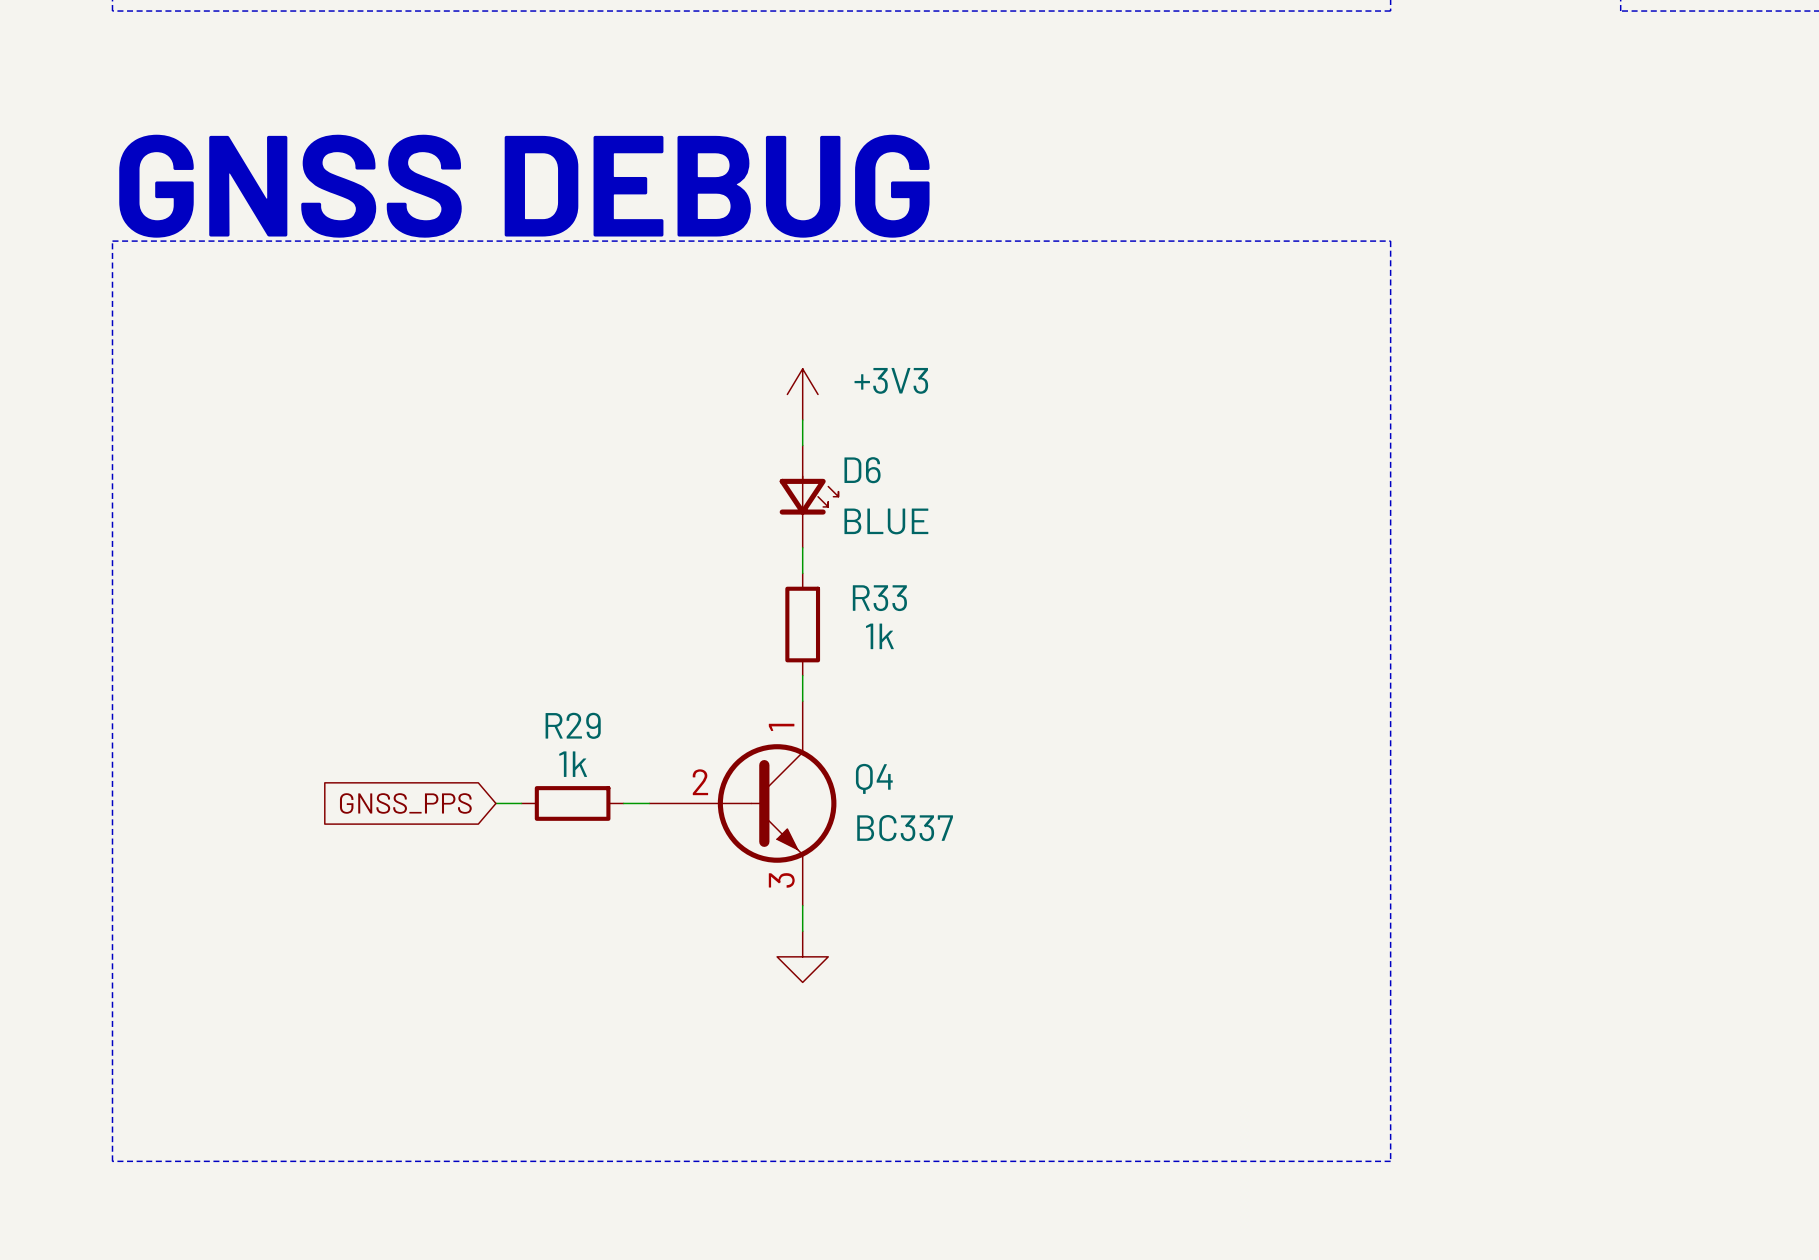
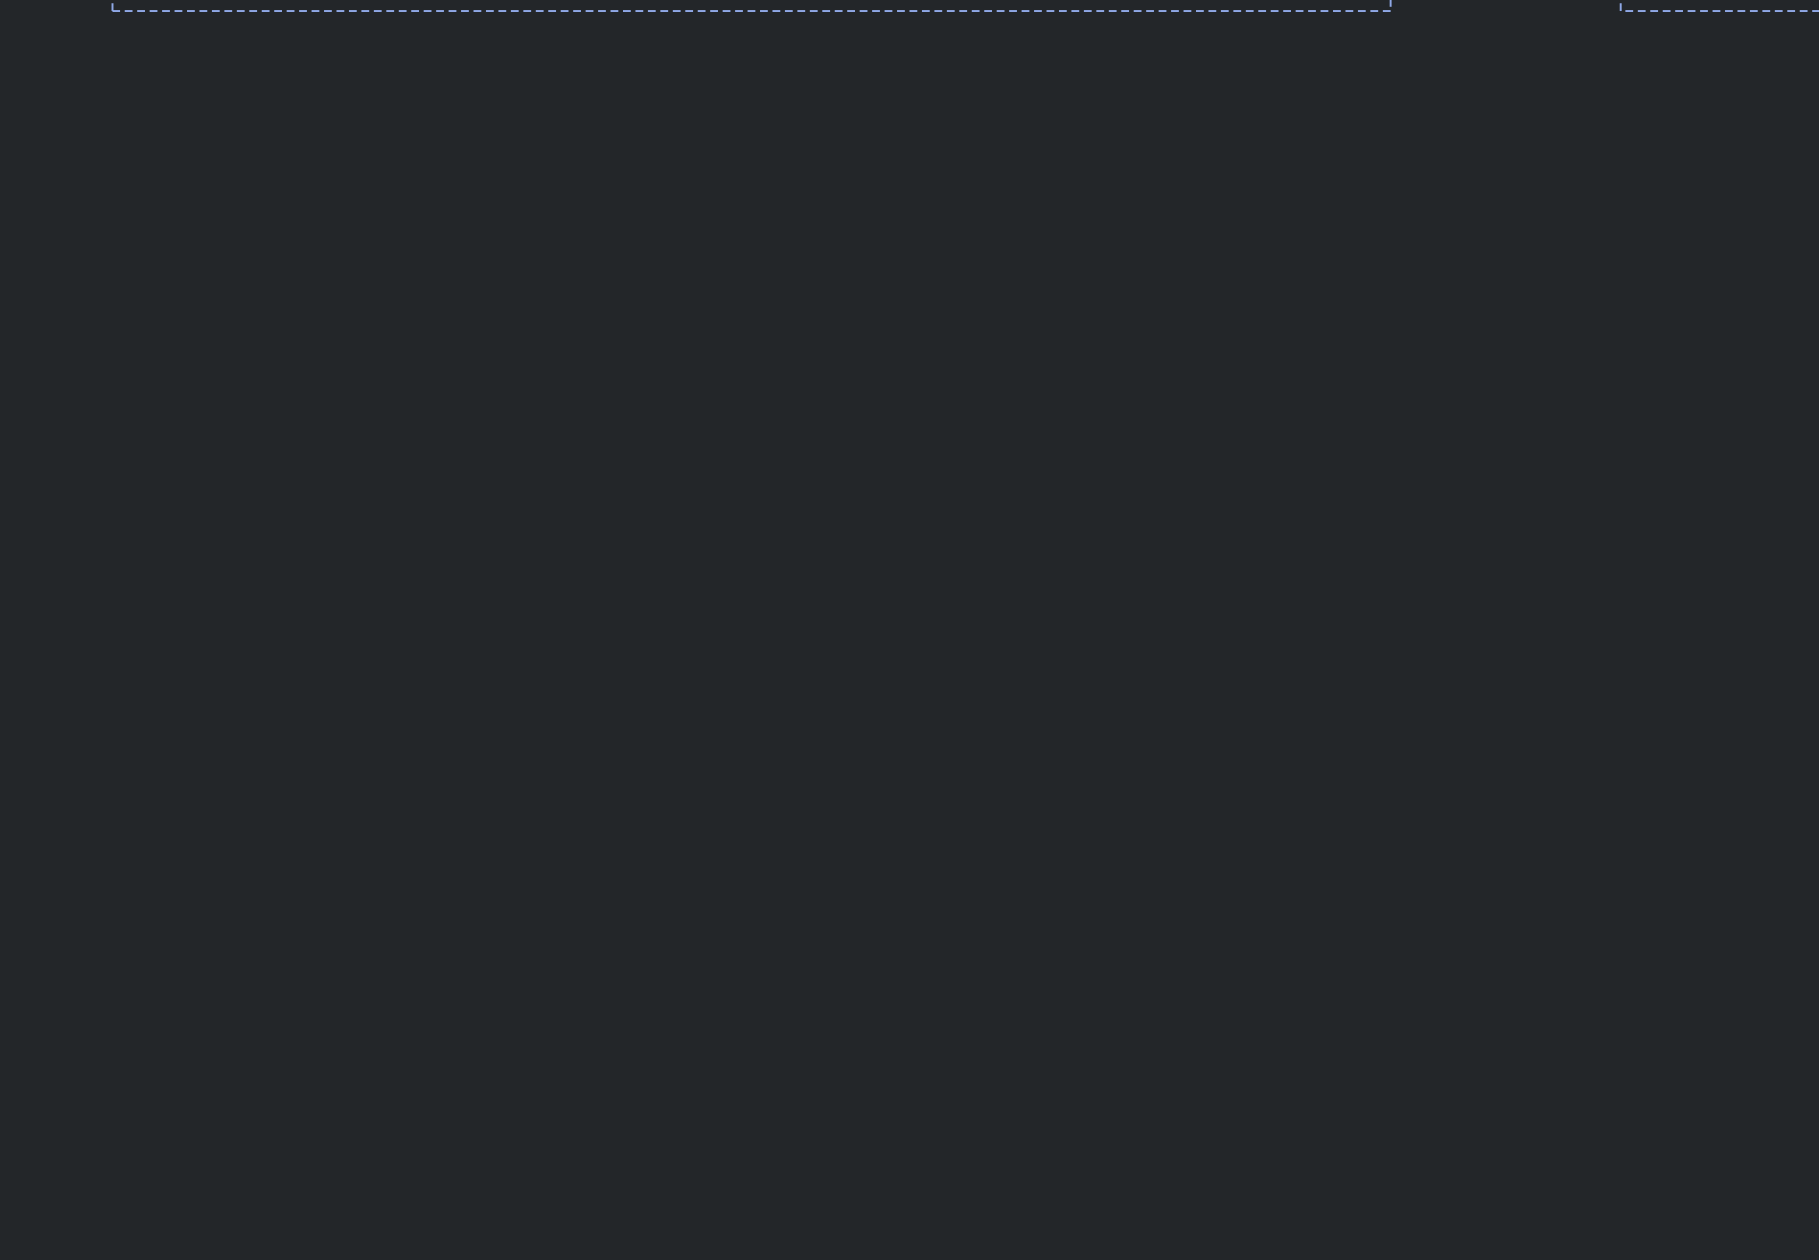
text: GNSS DEBUG (524, 186) -> none
line: (112, 241) (1390, 241) (1390, 1161) (112, 1161) (112, 241) -> none
power symbol: +3V3 (802, 394) -> none
wire: (802, 420) (802, 445) -> none
D6: BLUE (809, 496) -> none
wire: (802, 547) (802, 573) -> none
R33: 1k (802, 624) -> none
wire: (802, 675) (802, 701) -> none
global label: GNSS_PPS (405, 803) -> none
wire: (495, 803) (521, 803) -> none
R29: 1k (572, 803) -> none
wire: (623, 803) (649, 803) -> none
Q4: BC337 (742, 803) -> none
wire: (802, 905) (802, 931) -> none
power symbol: (802, 956) -> none

